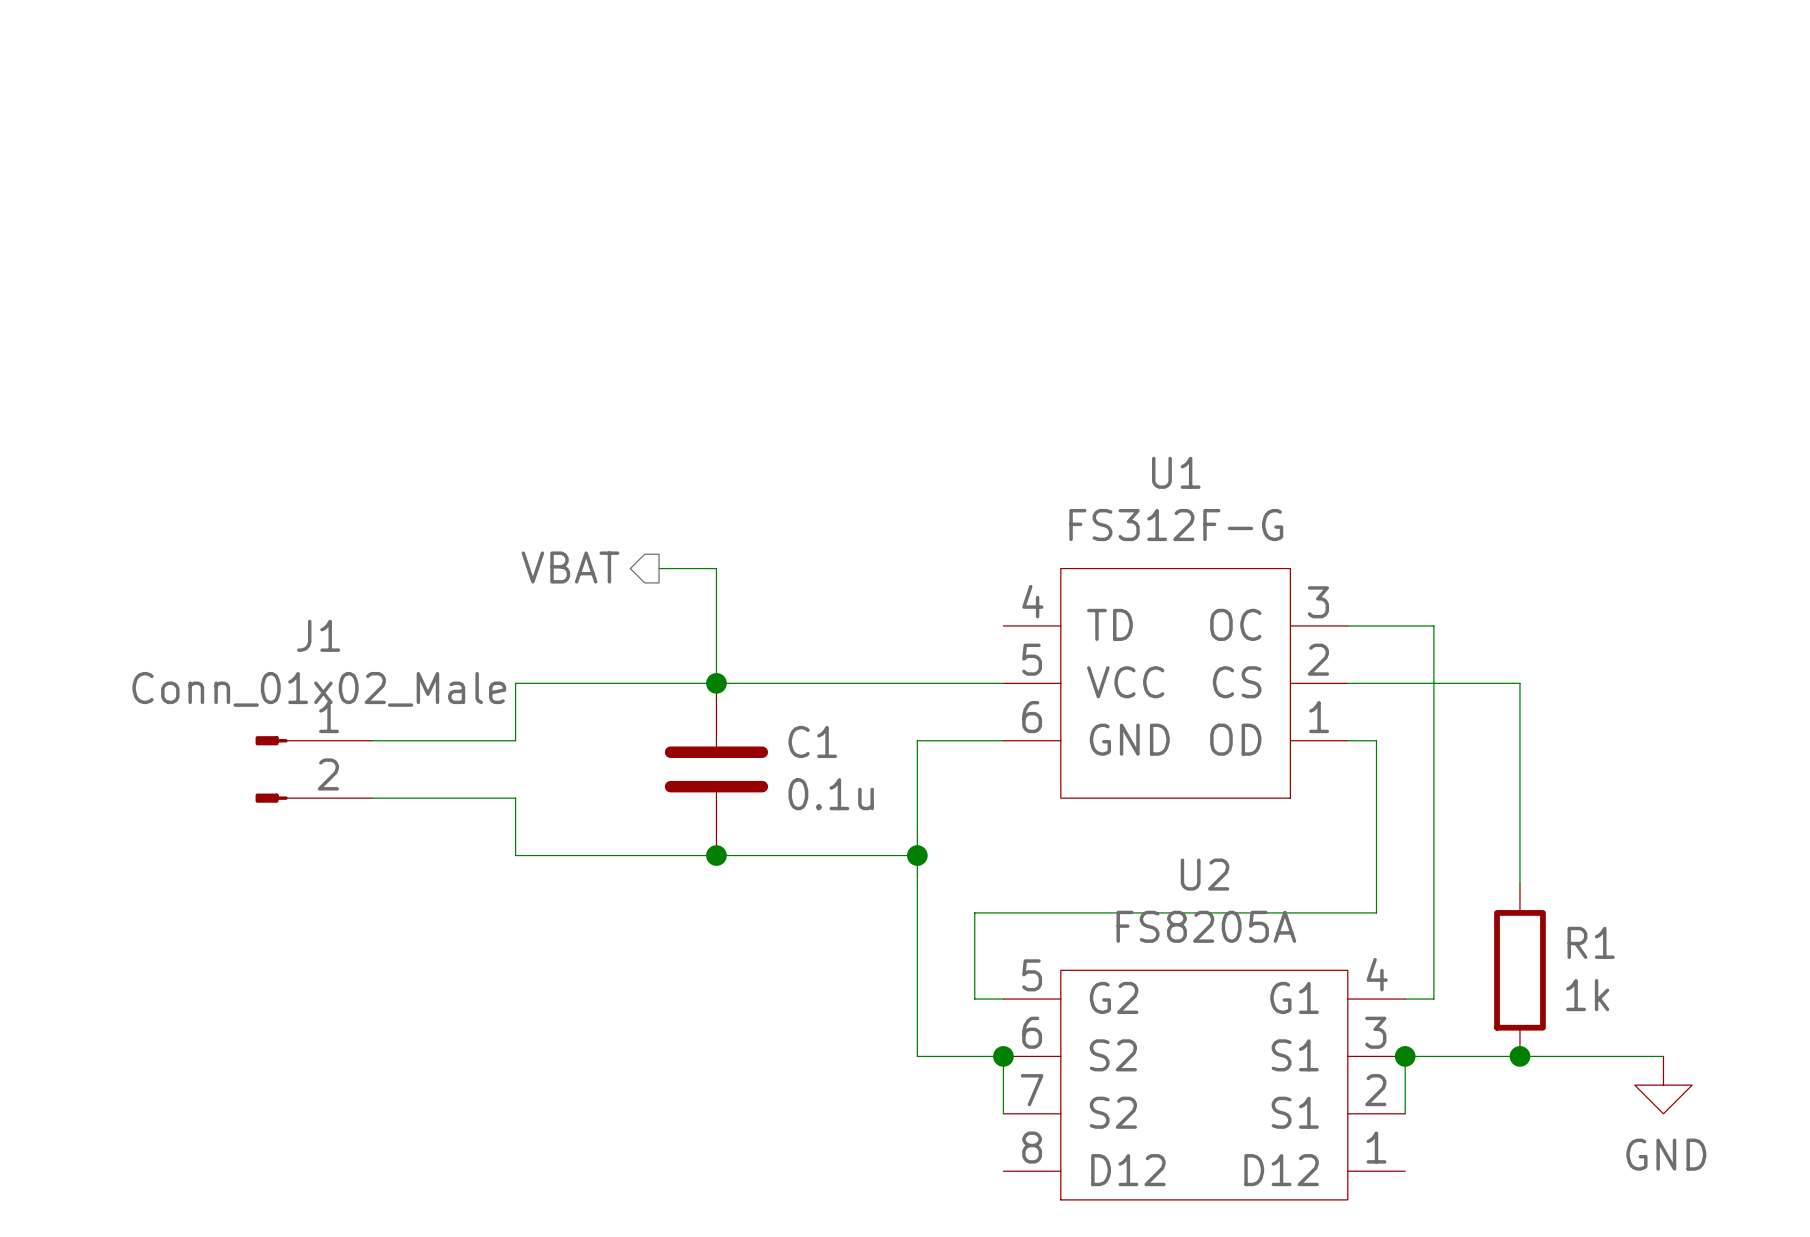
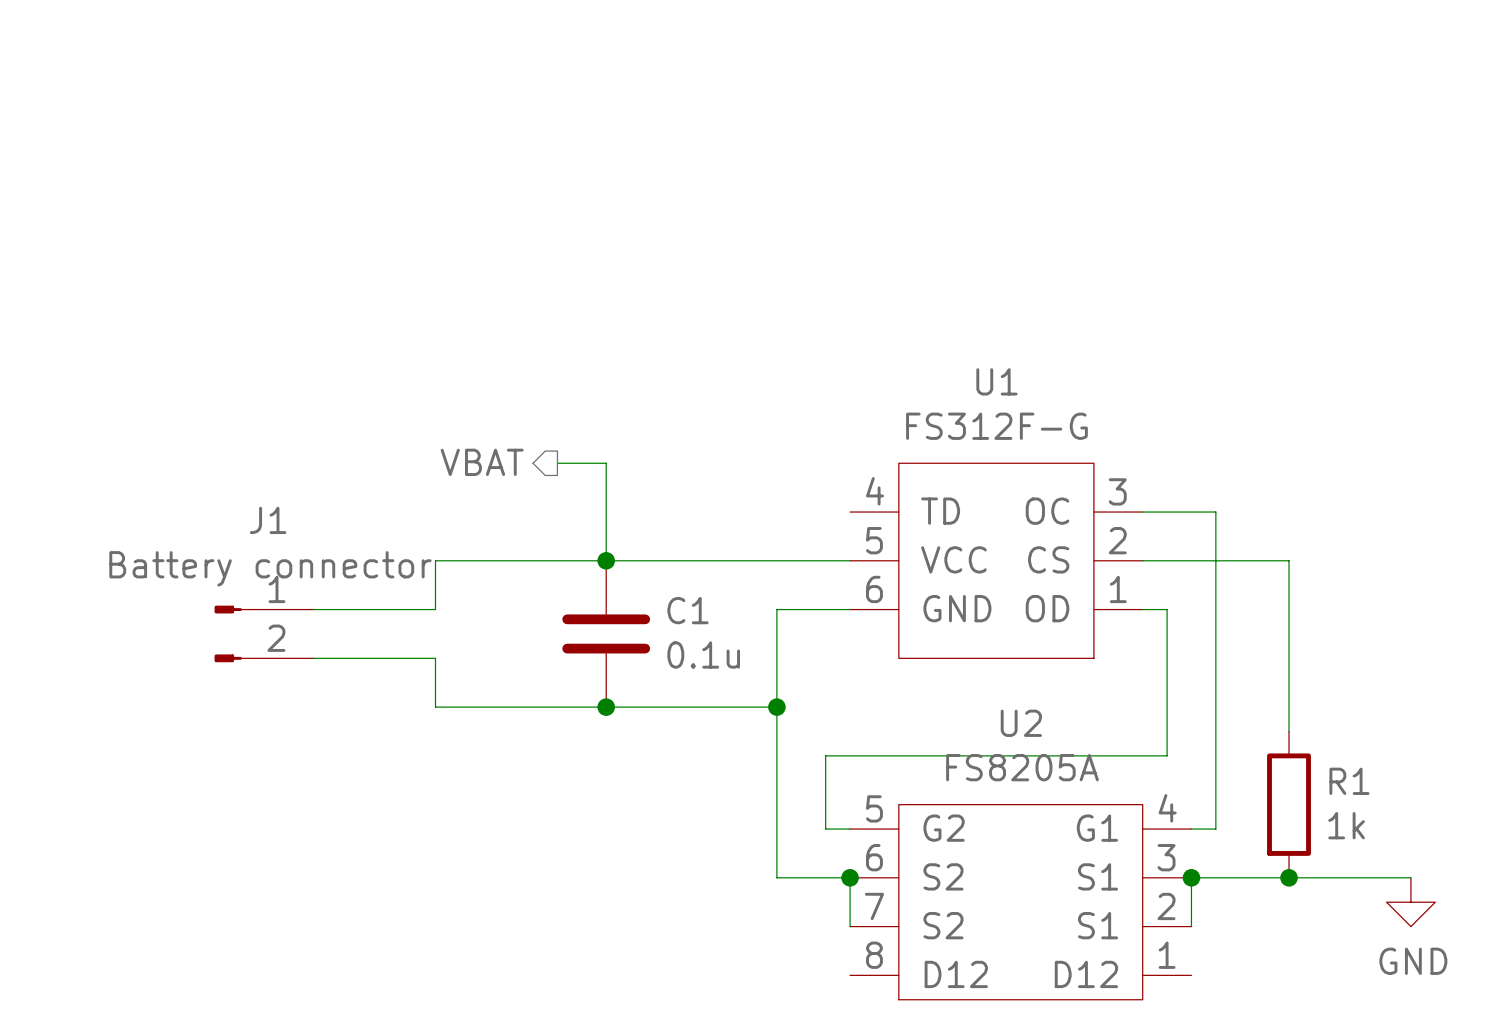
J1 value: Conn_01x02_Male (319, 689) -> Battery connector (270, 568)

